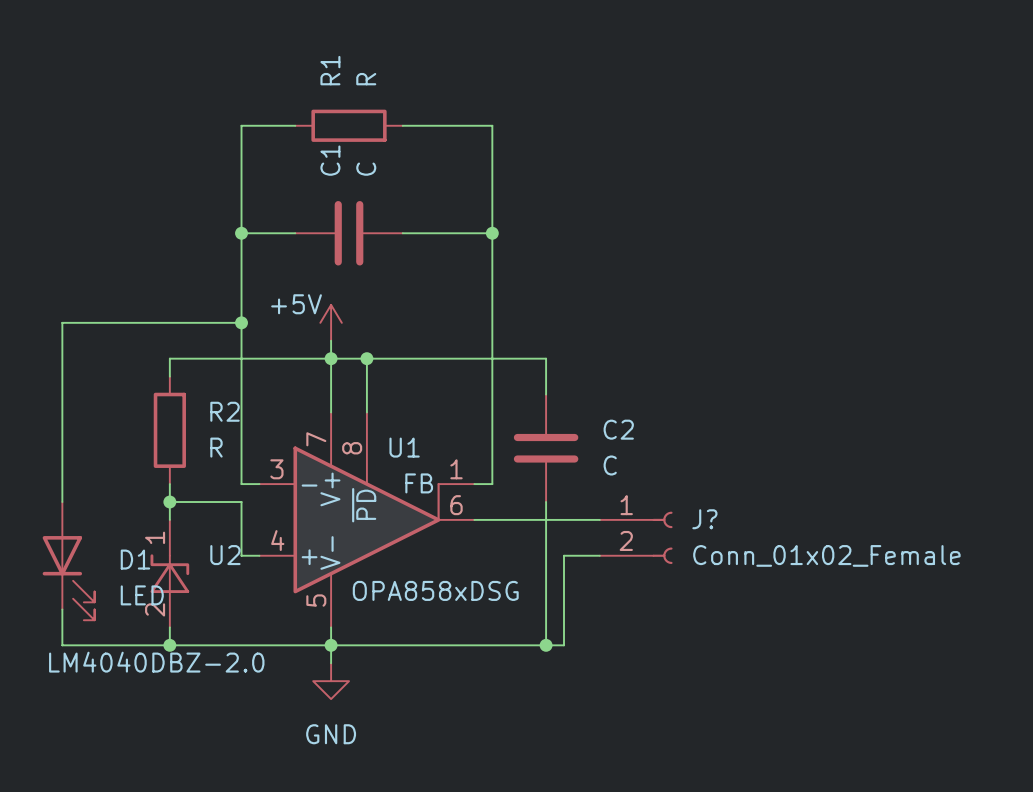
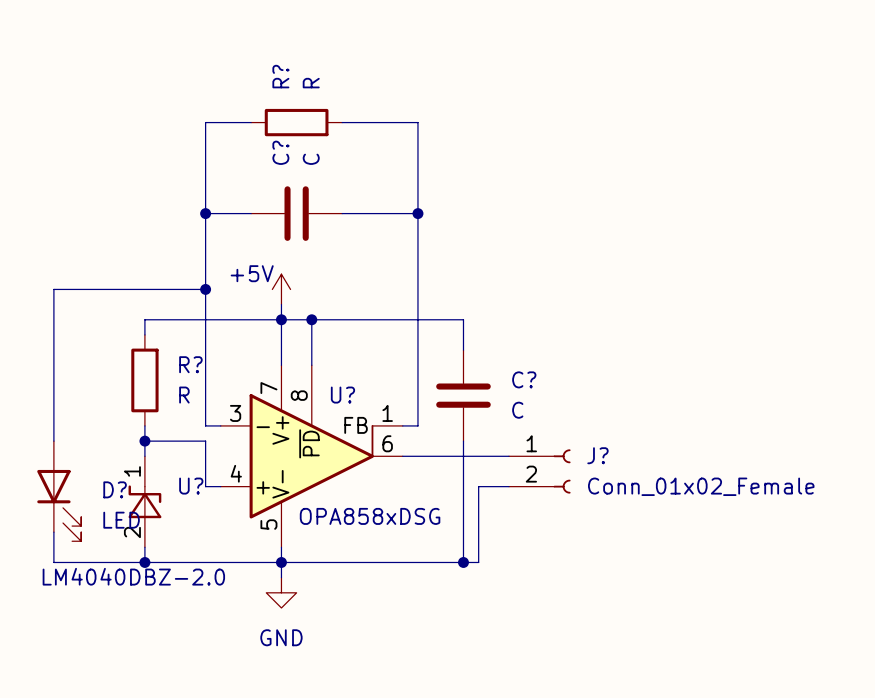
R1 name: R1 (330, 70) -> R? (280, 76)
C1 name: C1 (330, 160) -> C? (280, 152)
R2 name: R2 (225, 411) -> R? (190, 364)
C2 name: C2 (618, 429) -> C? (524, 379)
U1 name: U1 (404, 447) -> U? (342, 395)
U2 name: U2 (225, 555) -> U? (191, 486)
D1 name: D1 (135, 559) -> D? (115, 489)

